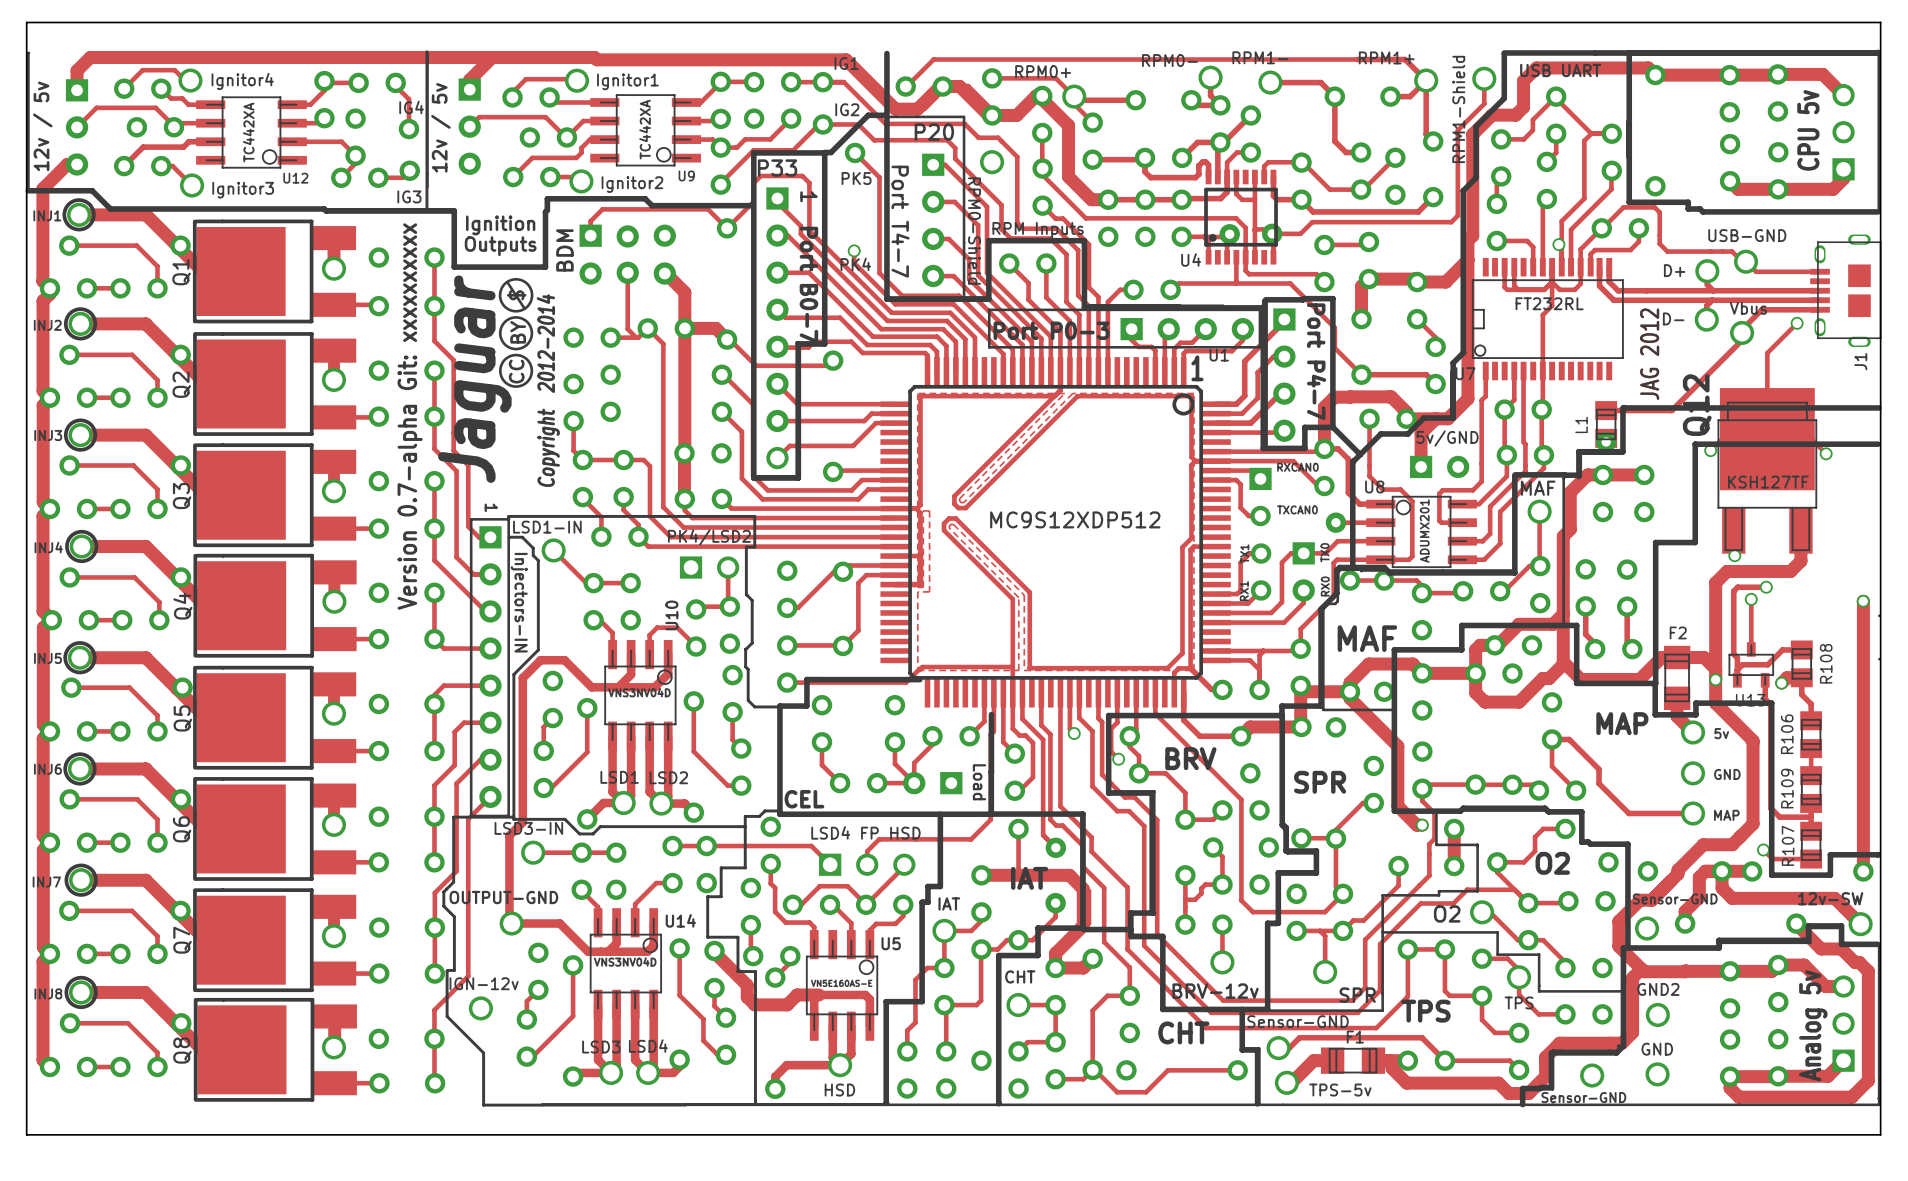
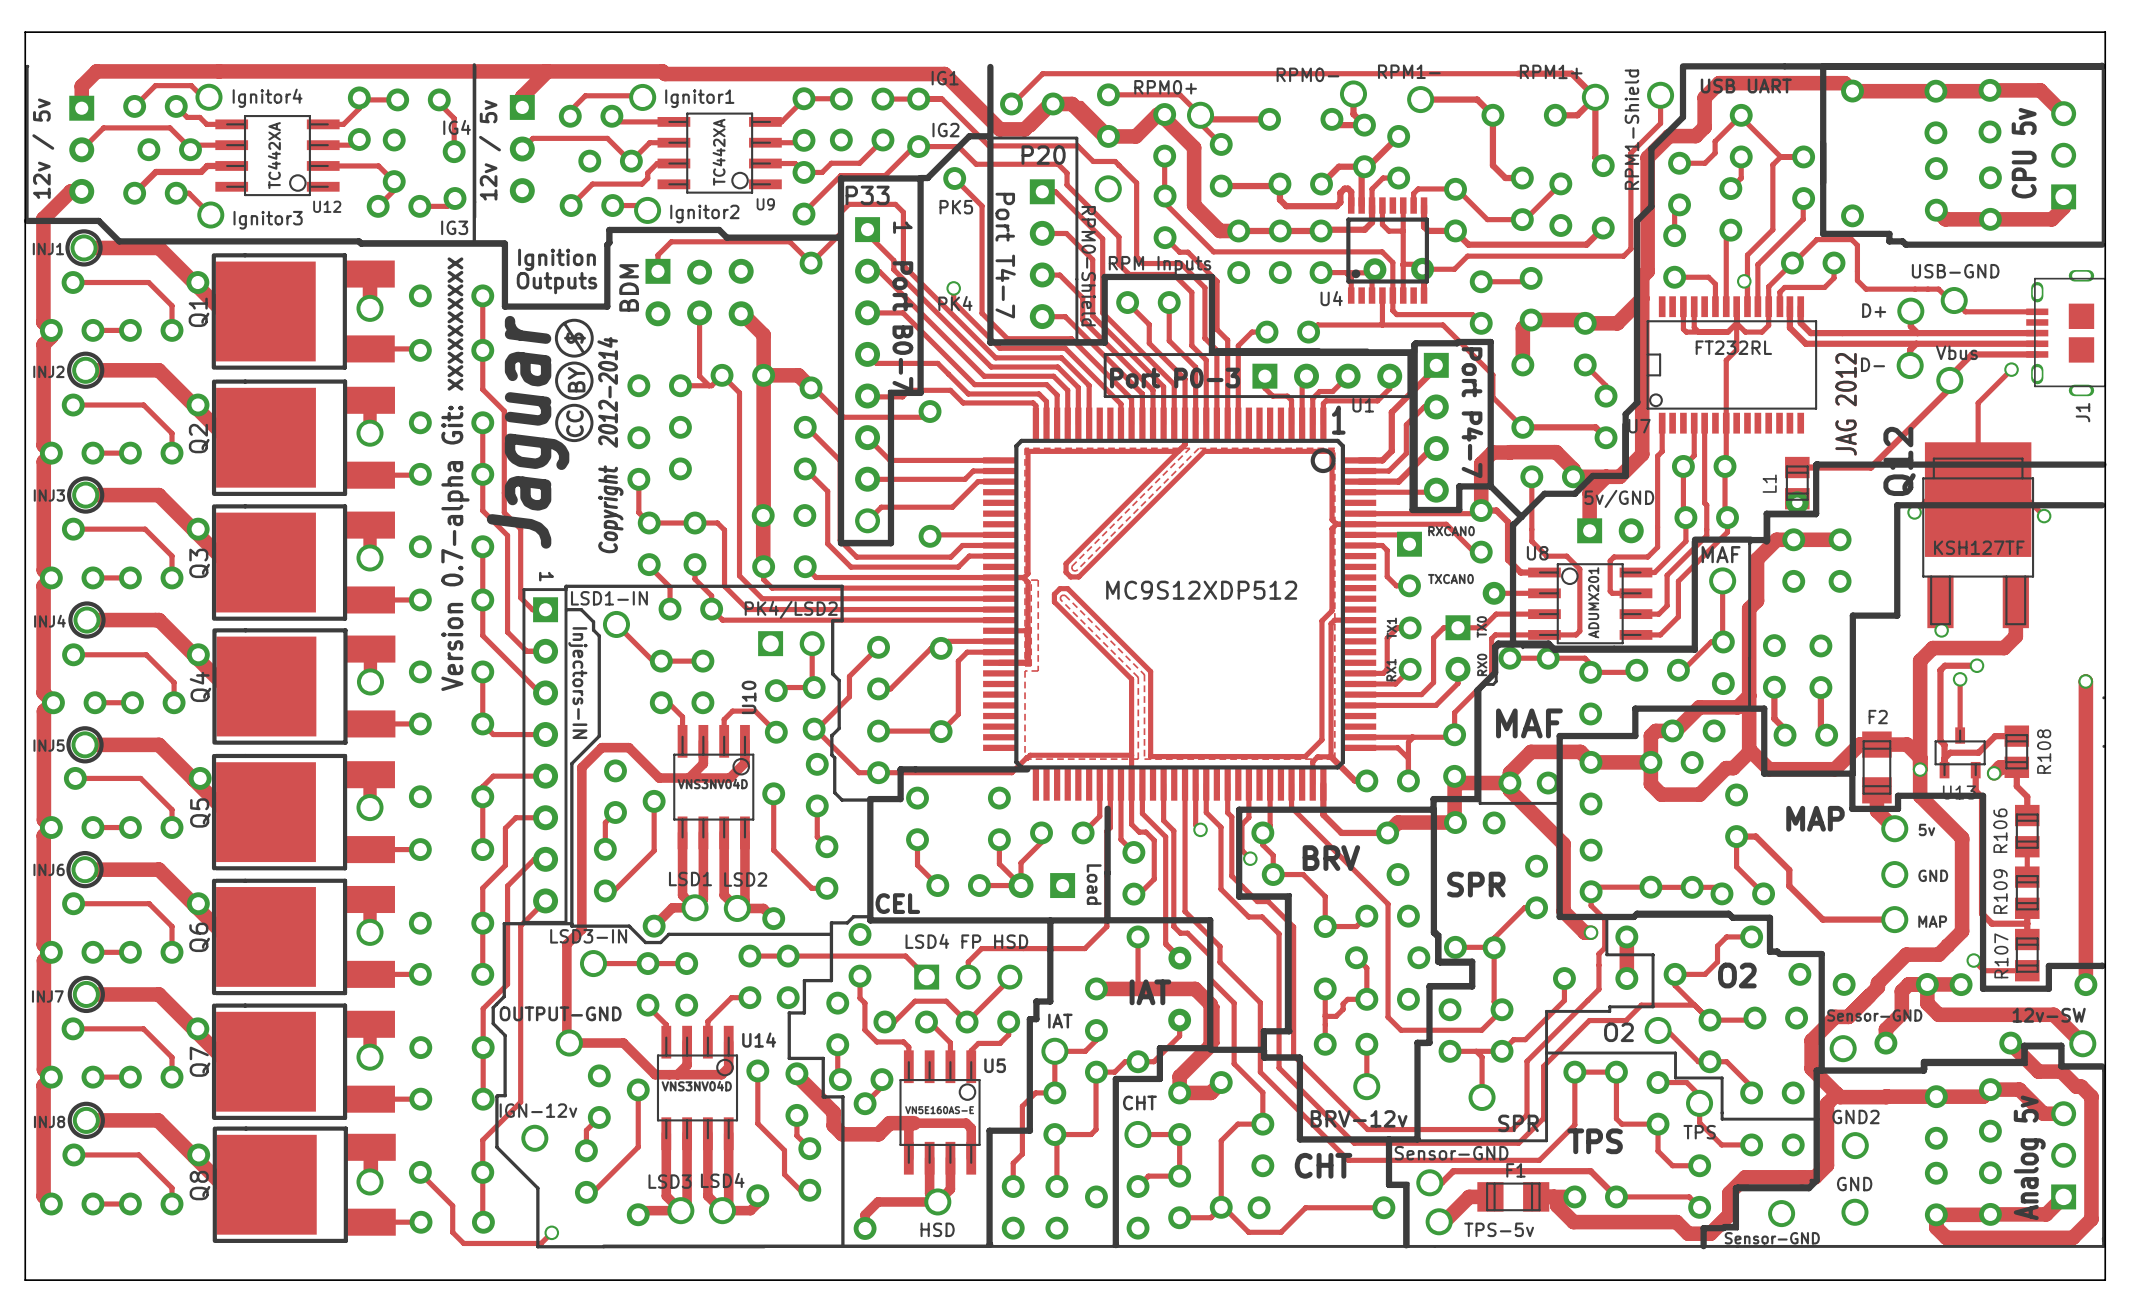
track: none -> (878, 647) (849, 676) (849, 696) (817, 729) (814, 729)
track: none -> (815, 729) (858, 772) (878, 772)
track: none -> (420, 1172) (452, 1205) (452, 1232) (463, 1243) (541, 1243) (551, 1232)
via: none -> (551, 1232)

